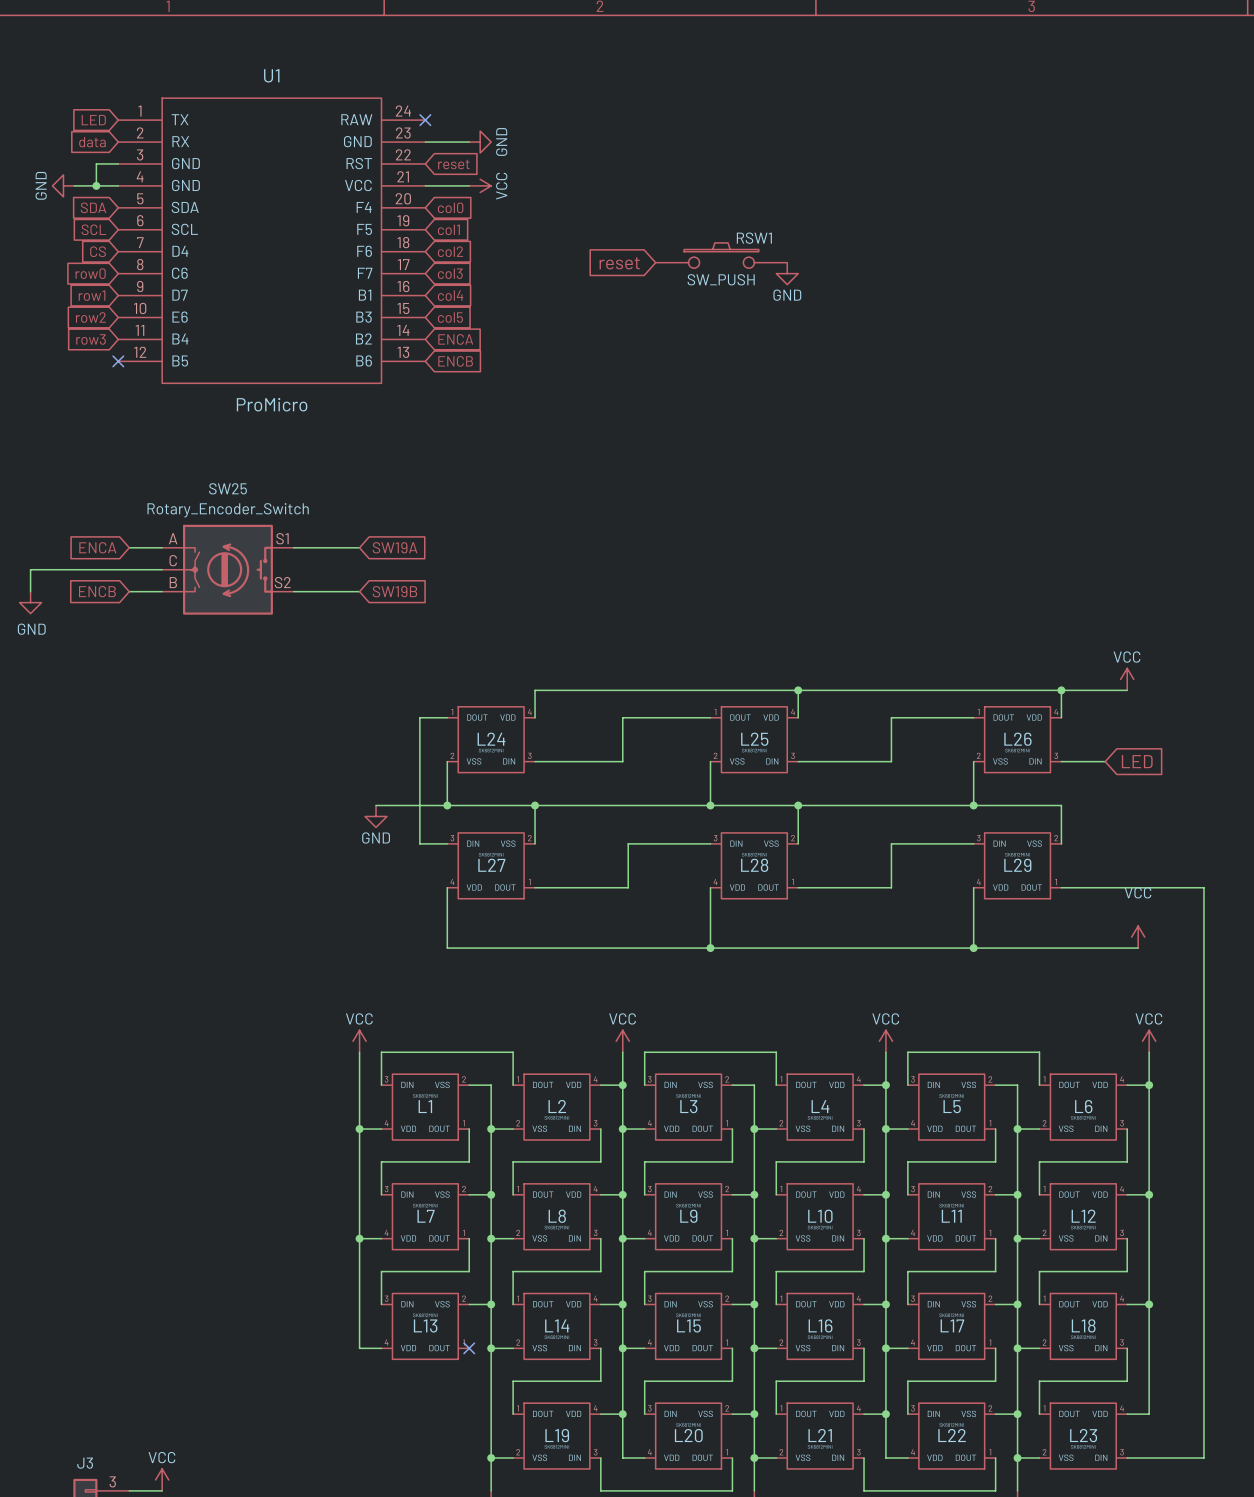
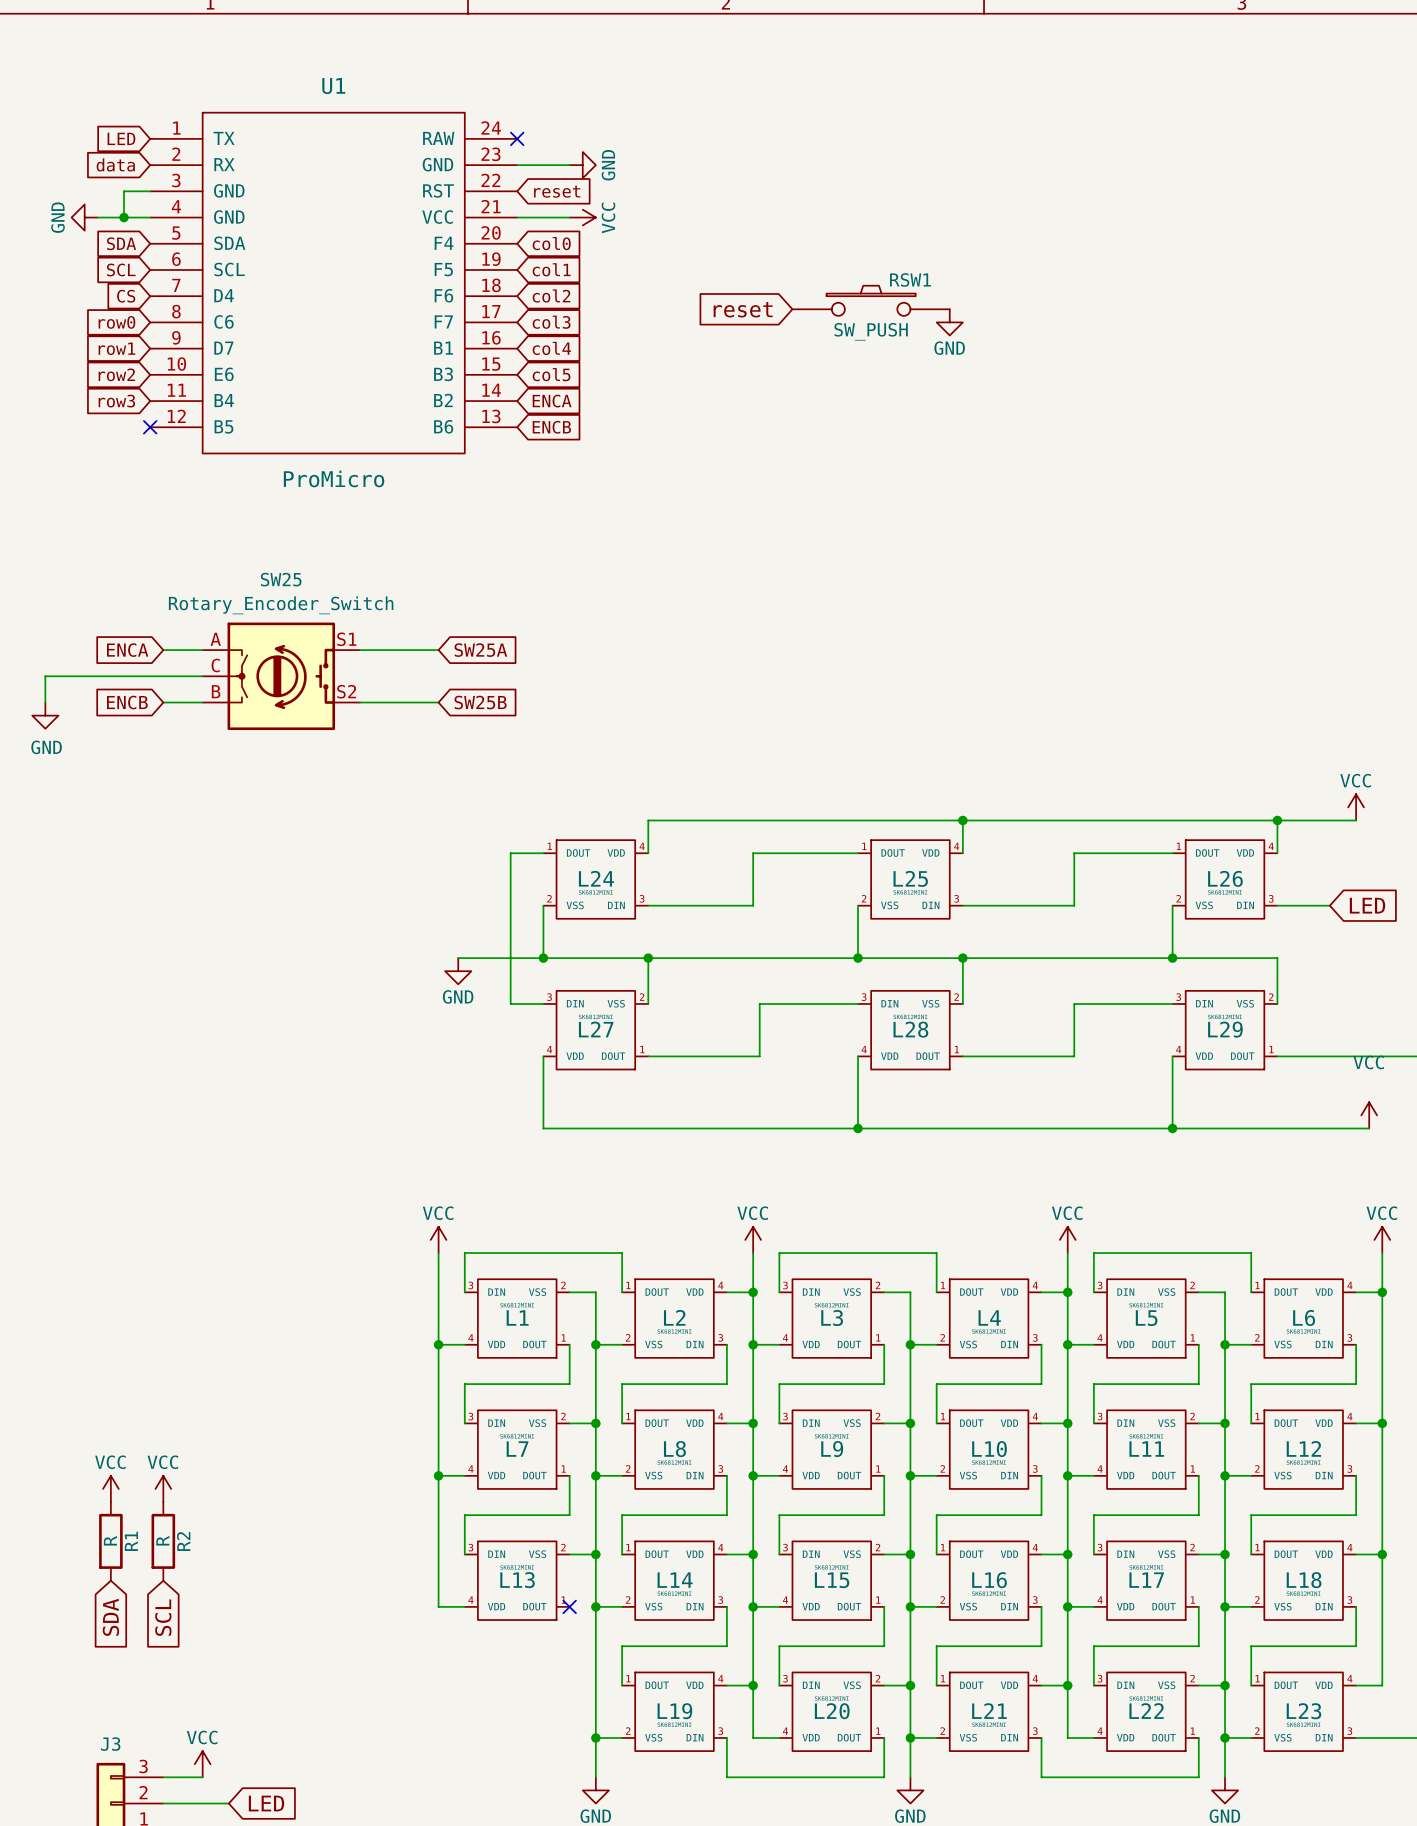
global label: SW19A (395, 547) -> SW25A (480, 650)
global label: SW19B (394, 591) -> SW25B (480, 702)
power symbol: none -> VCC (110, 1488)
power symbol: none -> VCC (163, 1488)
R1: none -> R (110, 1541)
R2: none -> R (163, 1541)
global label: none -> SCL (163, 1617)
global label: none -> SDA (110, 1617)

